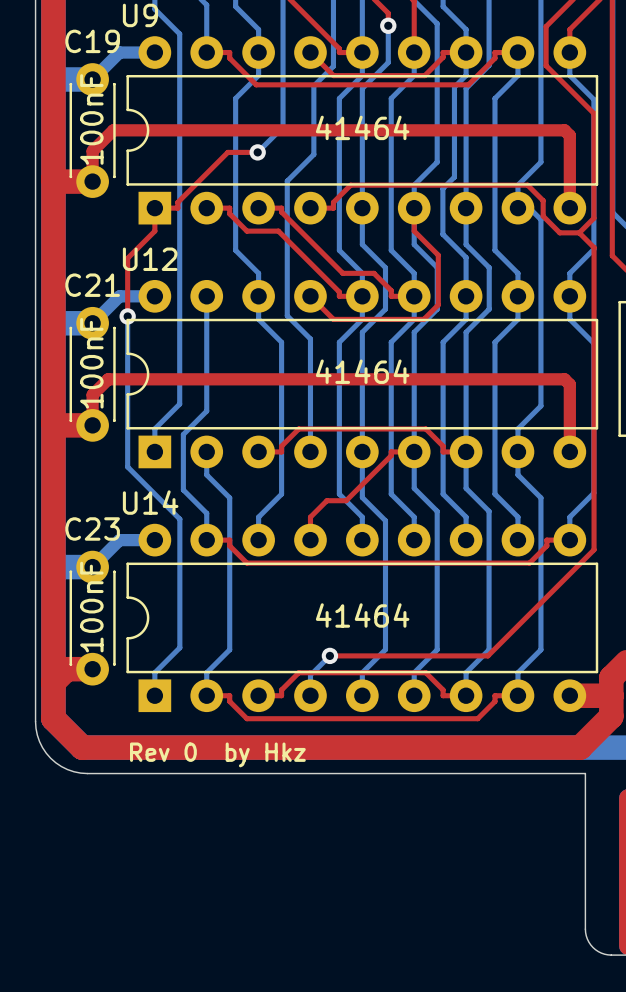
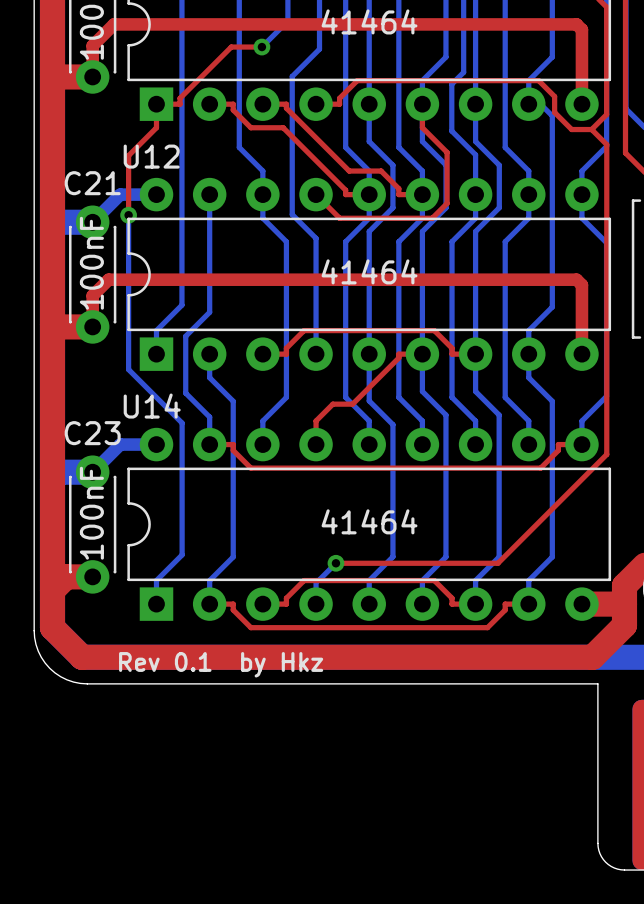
text: Rev 0 by Hkz (217, 754) -> Rev 0.1 by Hkz (221, 664)

